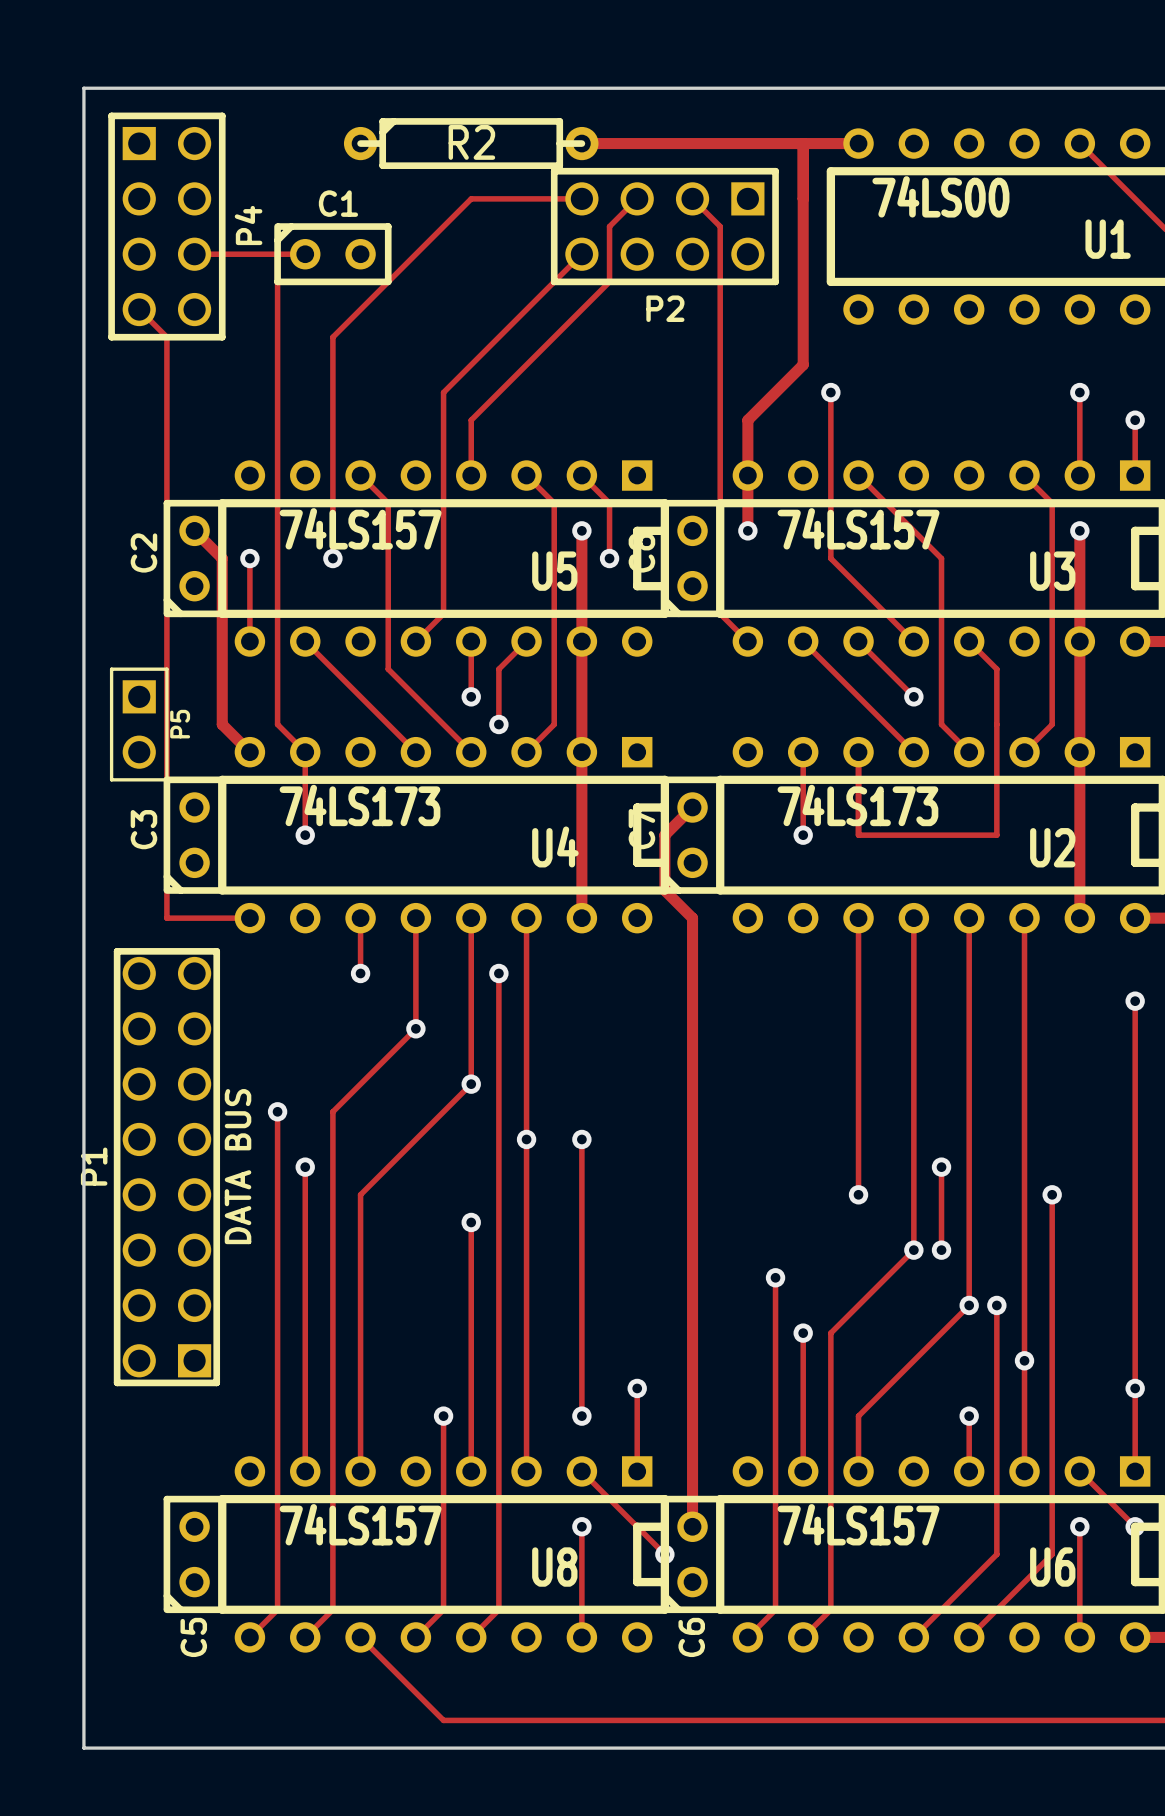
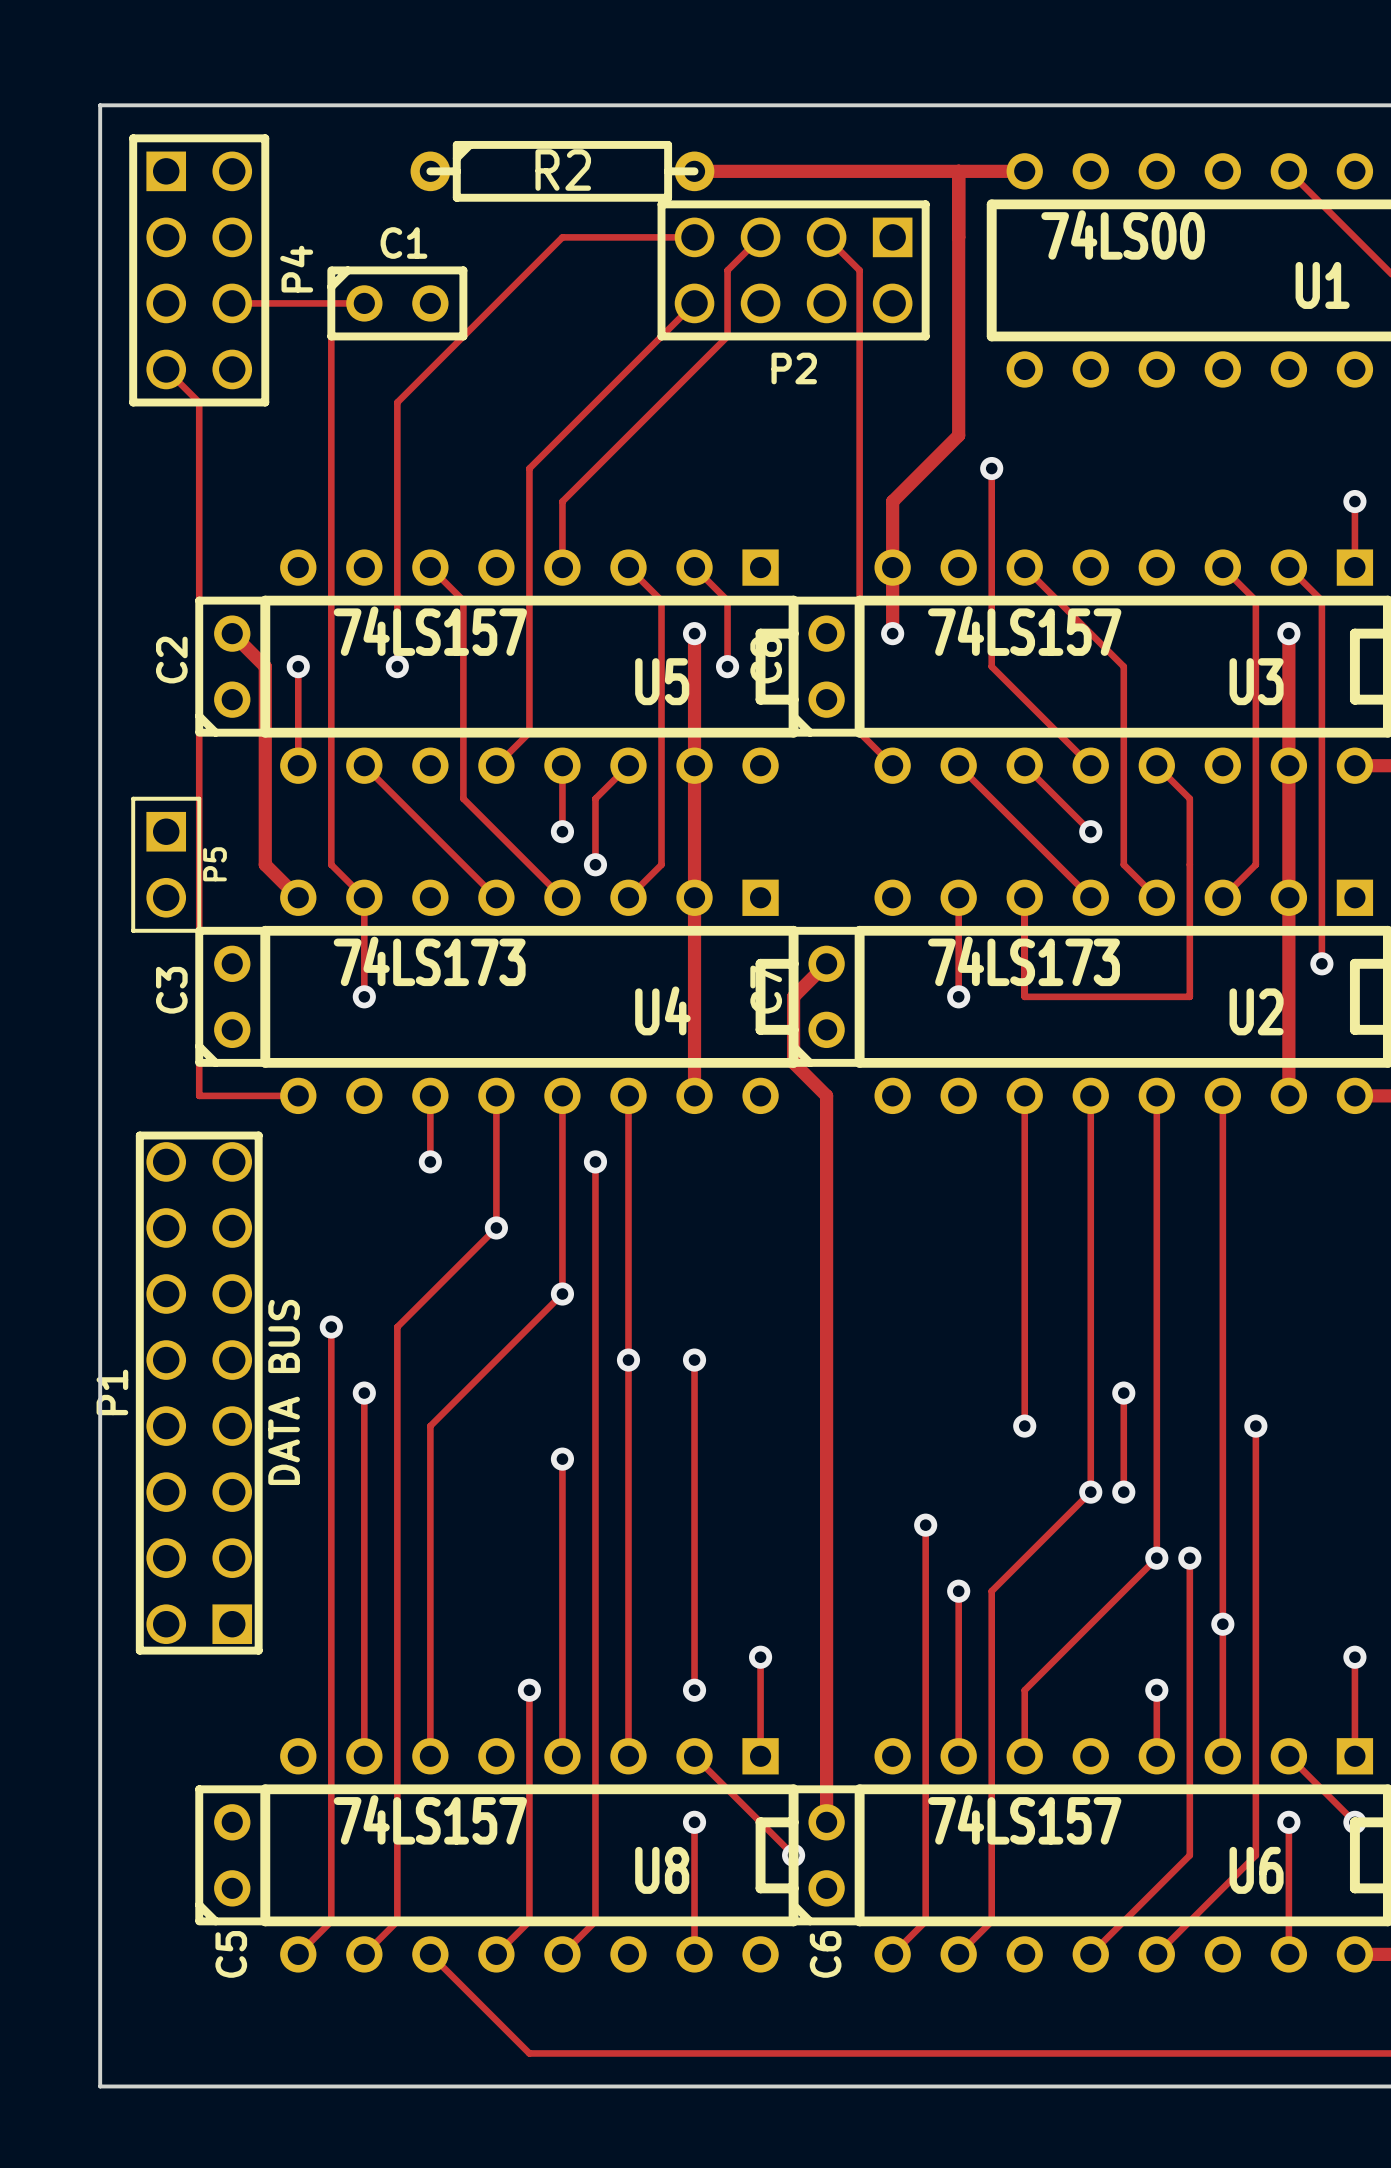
track: (1079, 392) (1079, 475) -> (1321, 963) (1321, 600) (1288, 567)
via: (1079, 392) -> none
via: none -> (1321, 963)
track: (1135, 1001) (1135, 1388) -> none
via: (1135, 1001) -> none

